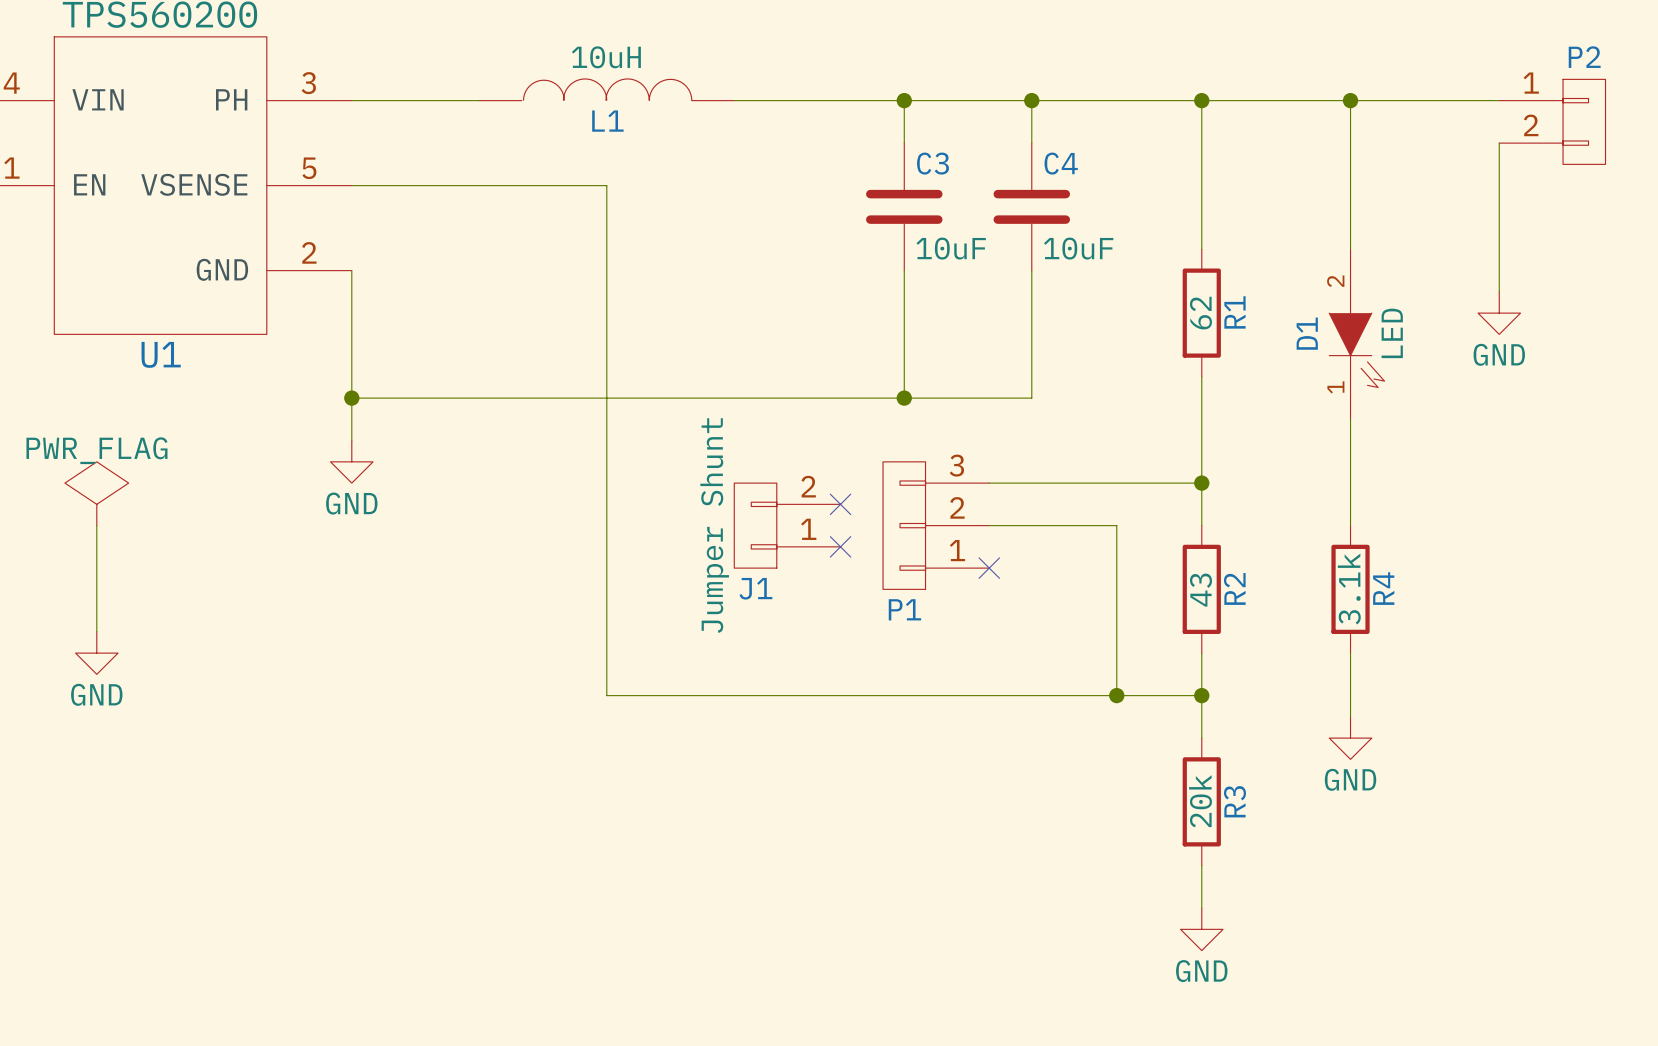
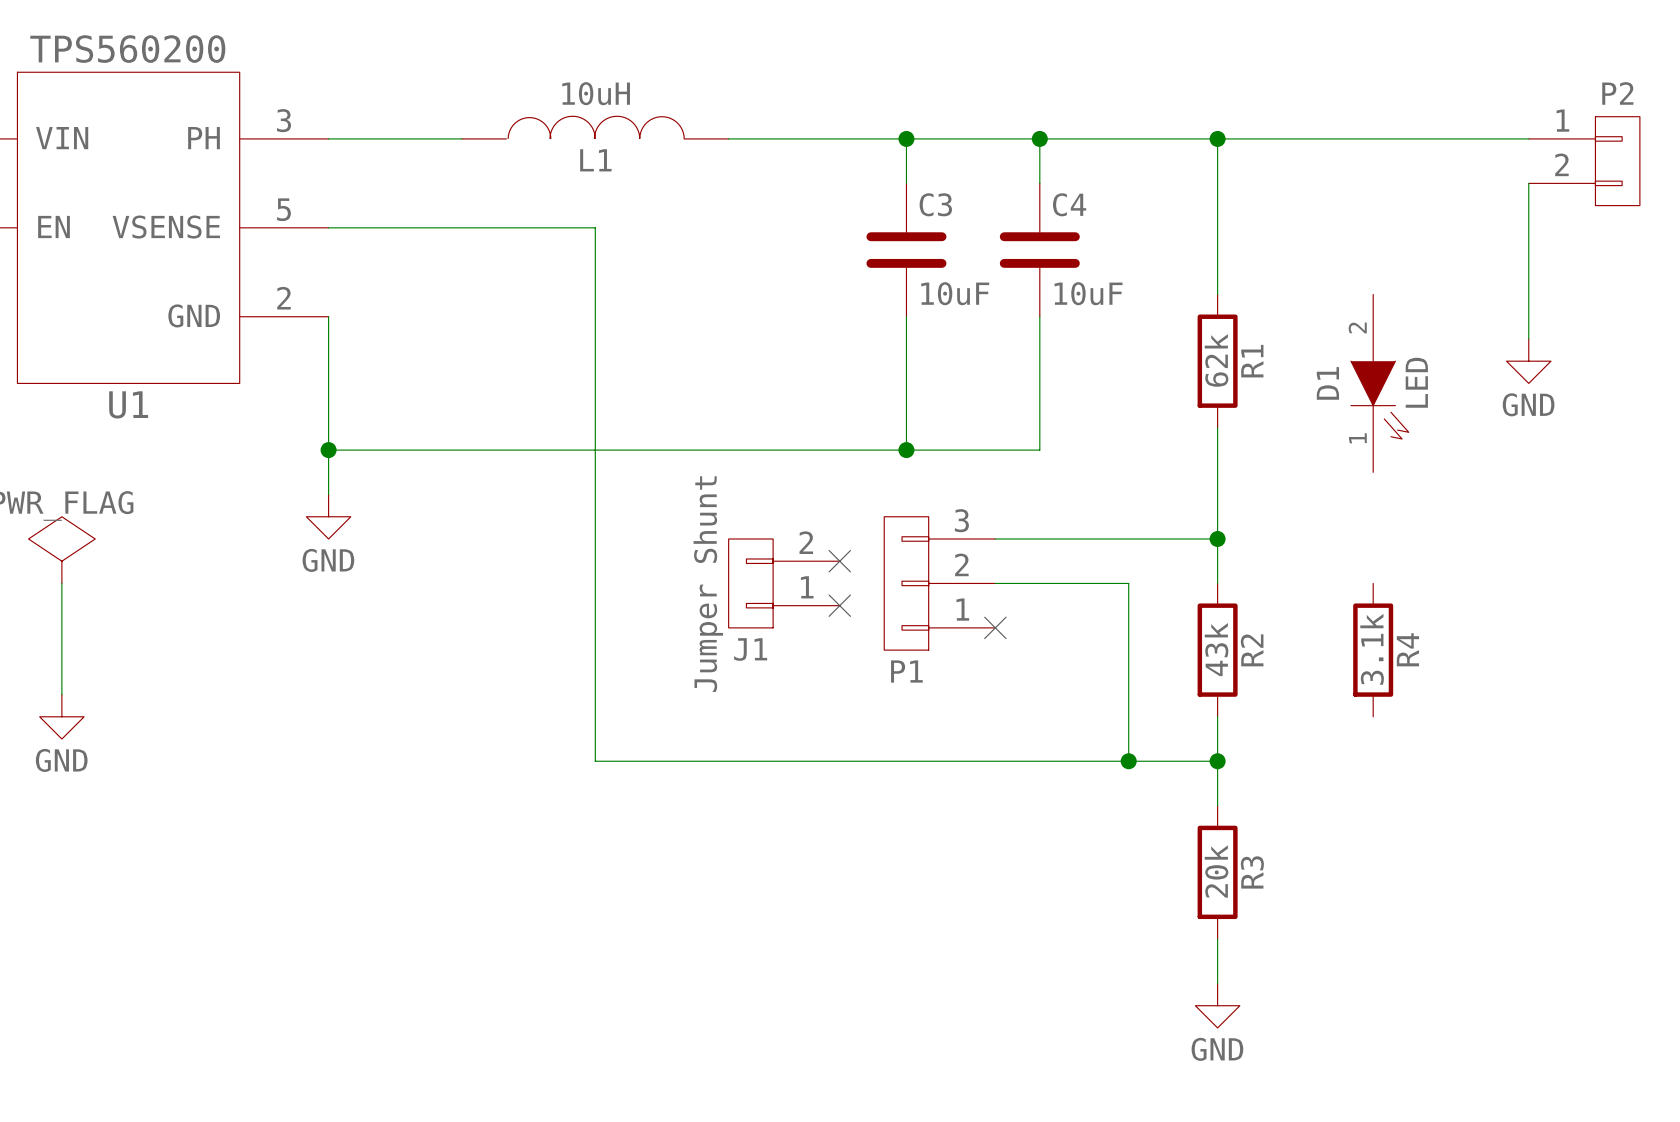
wire: (1350, 100) (1350, 249) -> none
junction: (1350, 100) -> none
R1 value: 62 (1200, 313) -> 62k (1216, 360)
wire: (1350, 419) (1350, 525) -> none
R2 value: 43 (1200, 590) -> 43k (1216, 649)
wire: (1350, 653) (1350, 716) -> none
power symbol: GND (1350, 738) -> none

